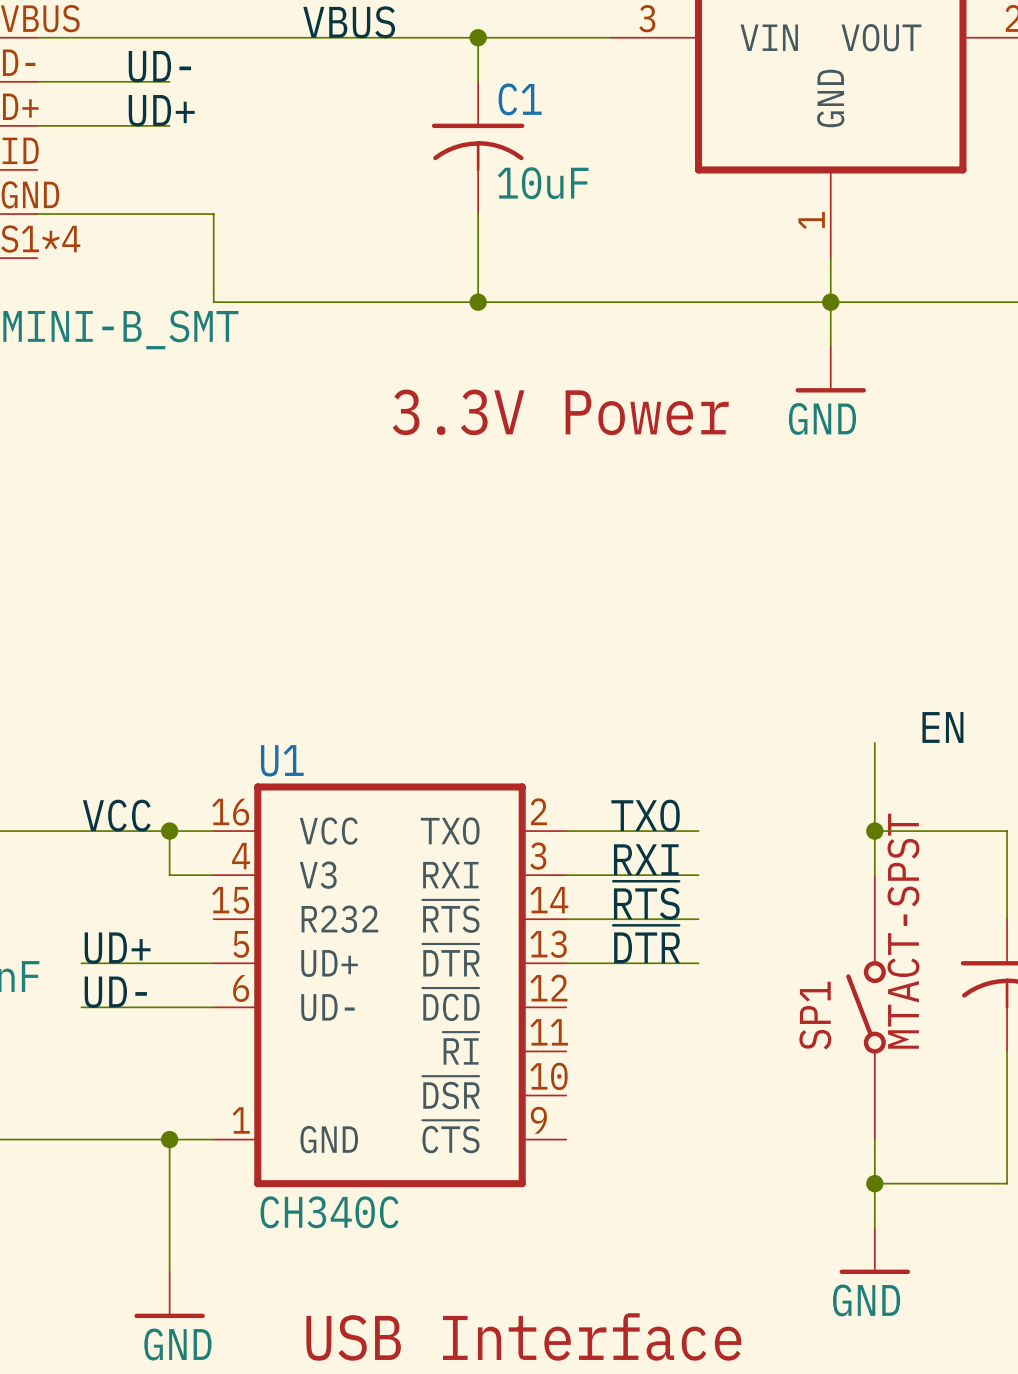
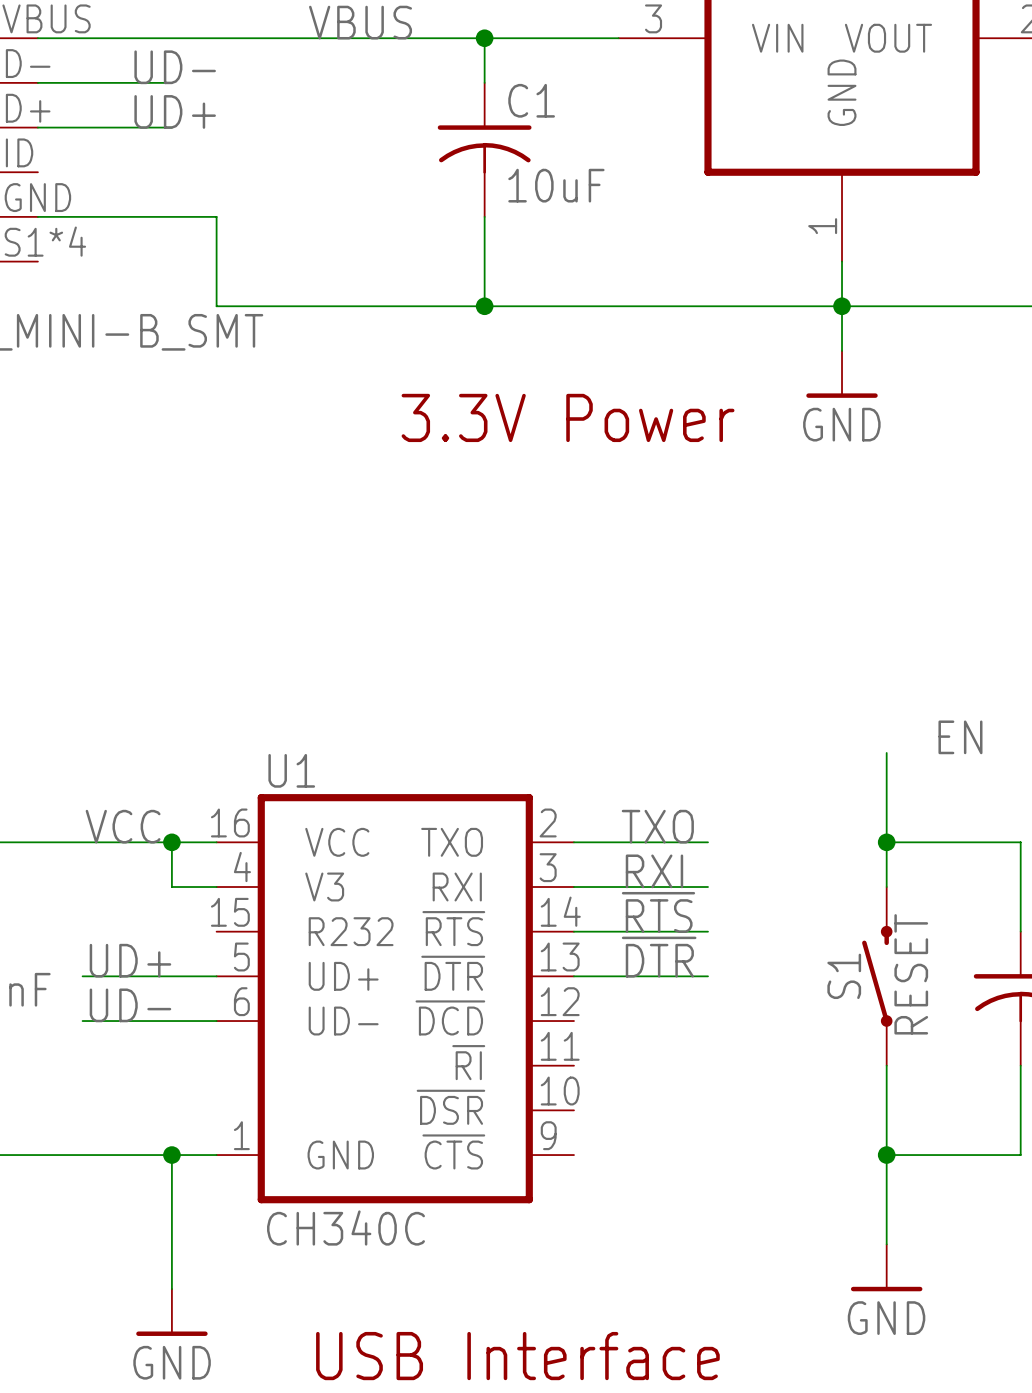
S1: none -> RESET (877, 976)
SP1: MTACT-SPST (866, 1007) -> none
wire: (1007, 1139) (1007, 1183) (874, 1183) -> (1020, 1155) (886, 1155) (886, 1065)
junction position: (874, 1183) -> (886, 1155)

